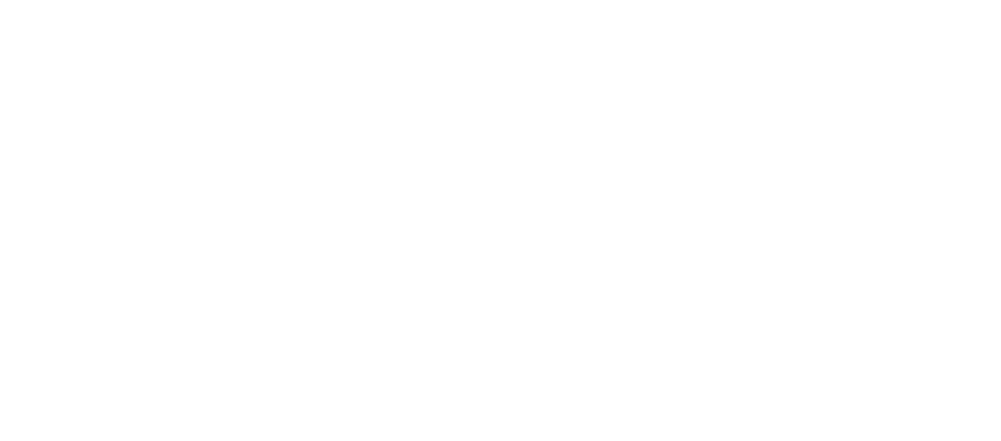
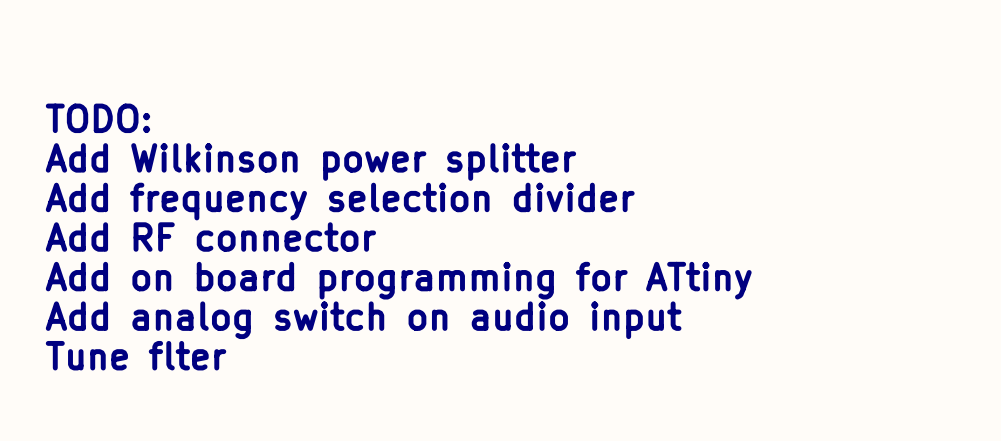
text: none -> TODO: (98, 118)
text: none -> Add Wilkinson power splitter (310, 161)
text: none -> Add frequency selection divider (340, 201)
text: none -> Add RF connector (210, 237)
text: none -> Add on board programming for ATtiny (398, 280)
text: none -> Add analog switch on audio input (363, 320)
text: none -> Tune flter (136, 355)

